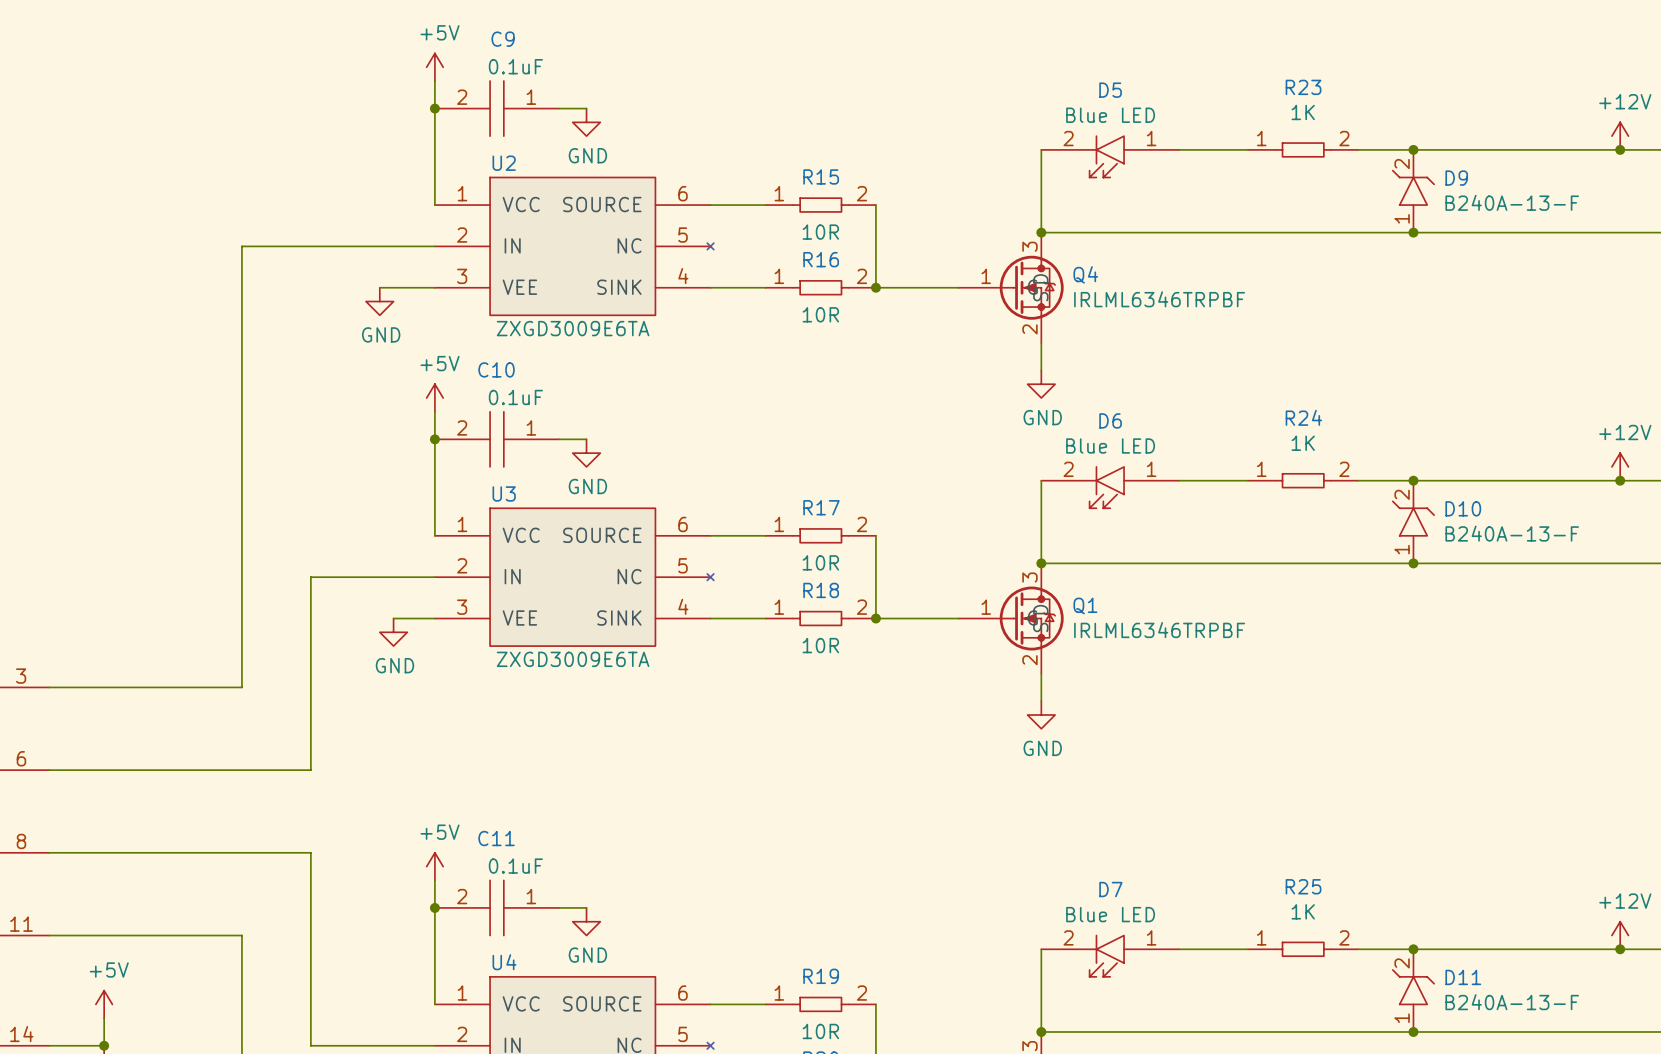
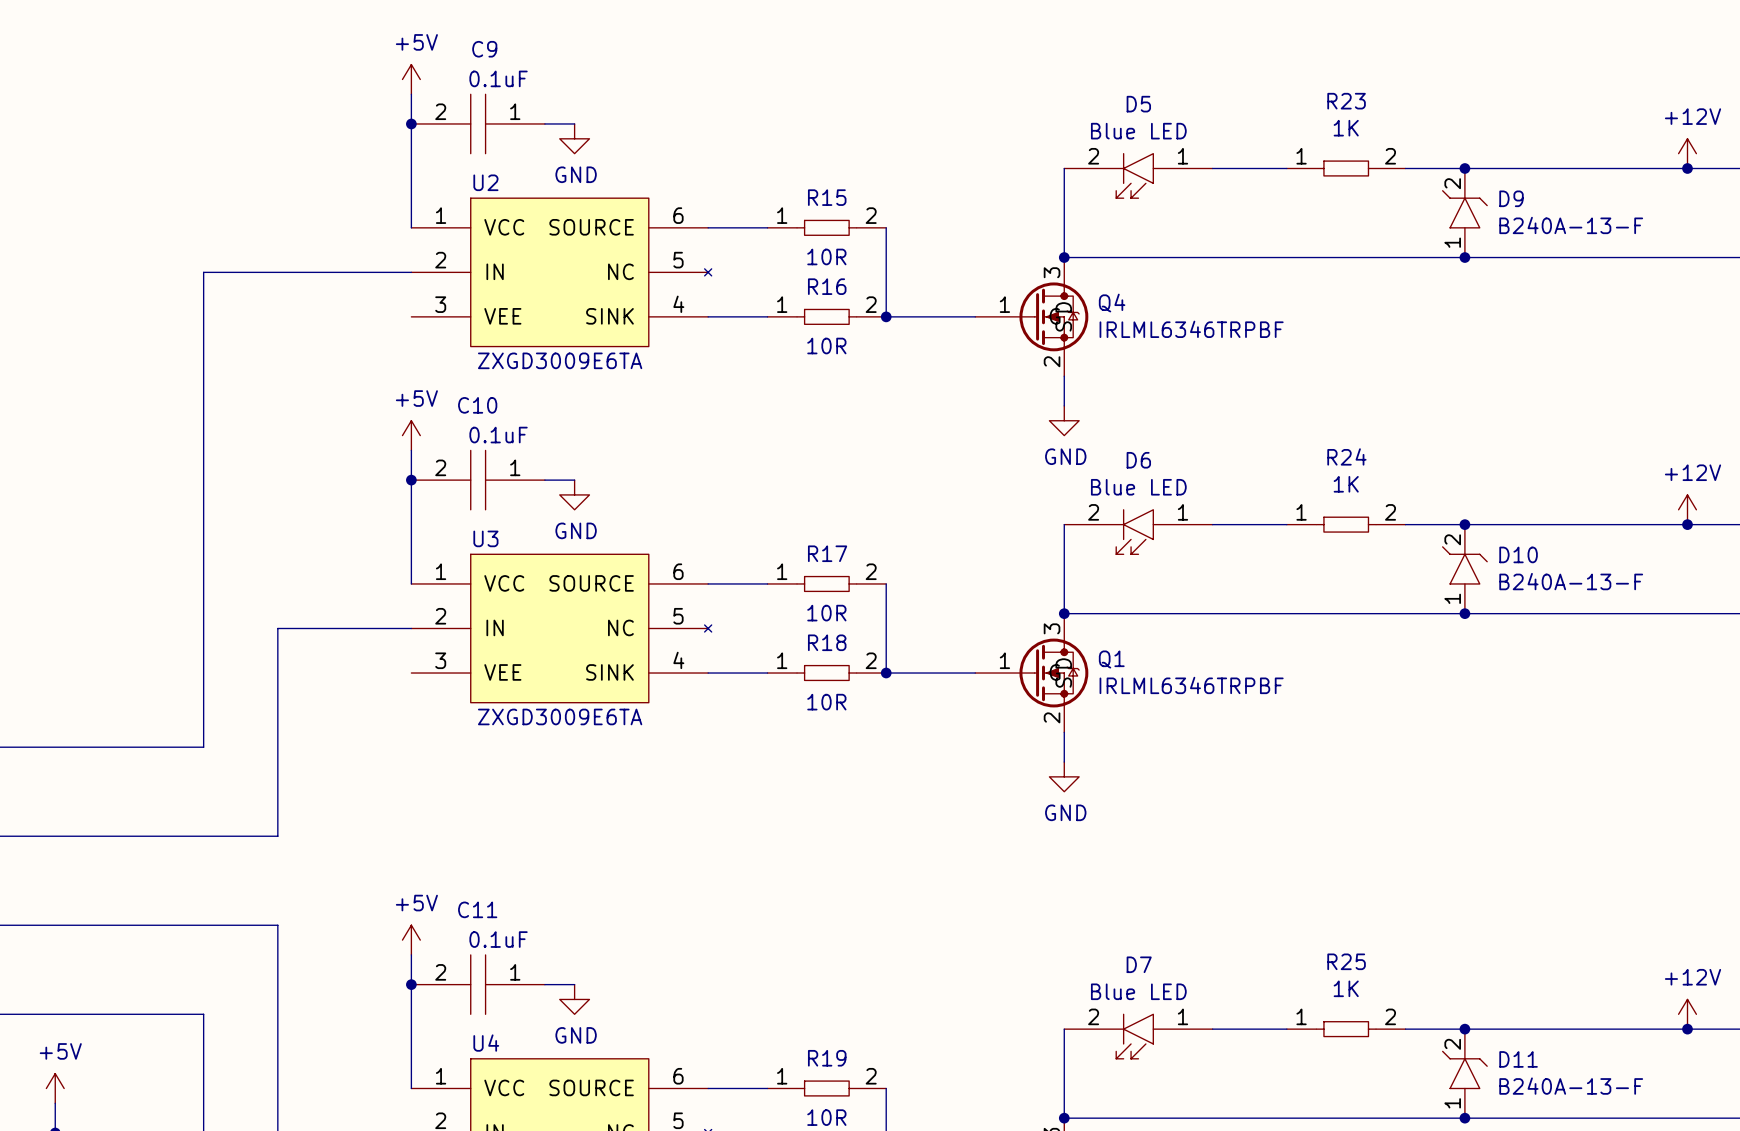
wire: (379, 287) (434, 287) -> none
power symbol: GND (379, 301) -> none
wire: (393, 618) (434, 618) -> none
power symbol: GND (393, 632) -> none

